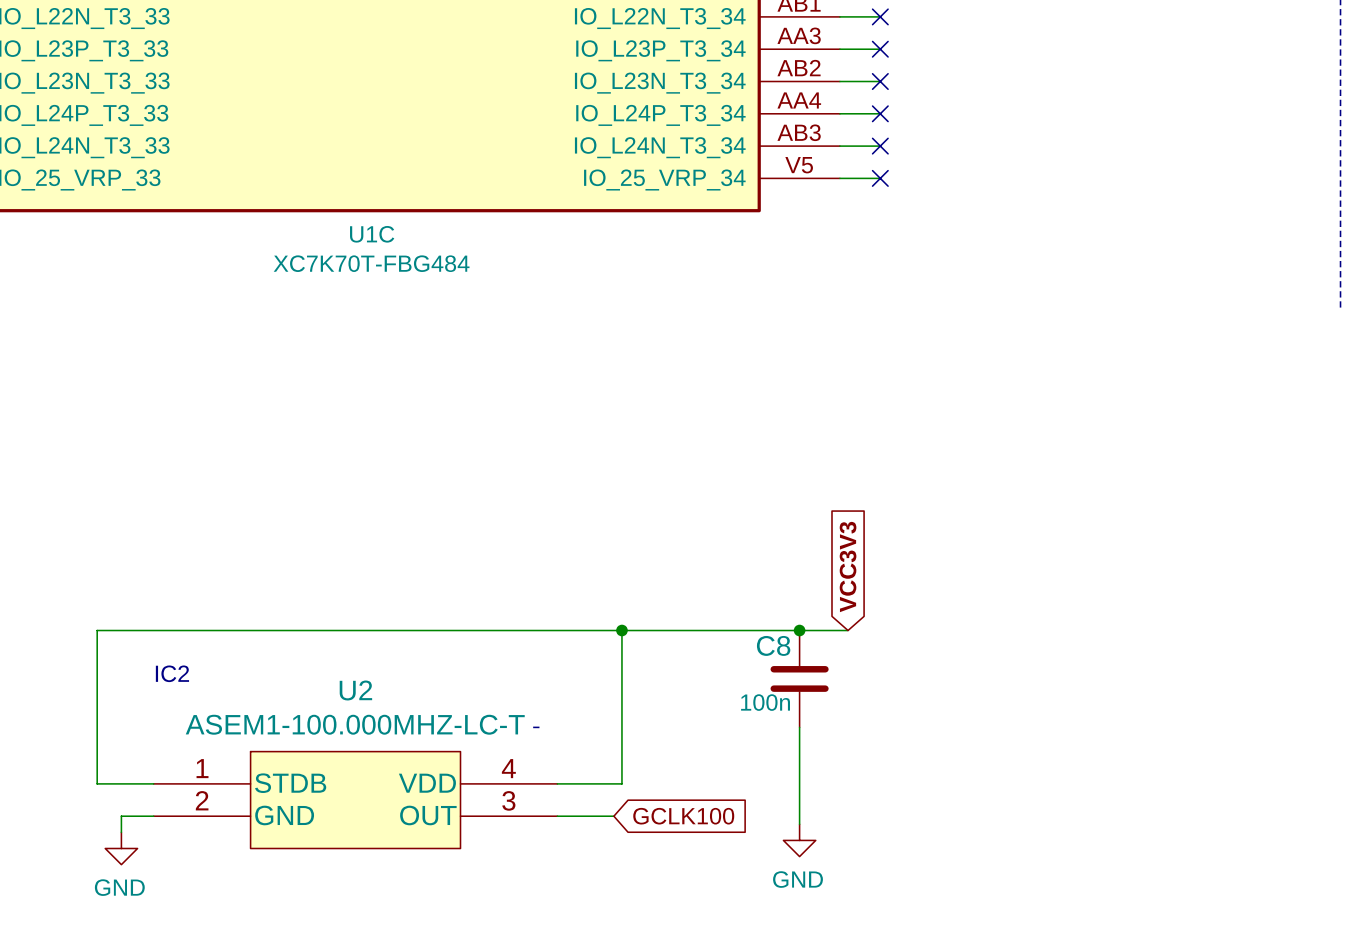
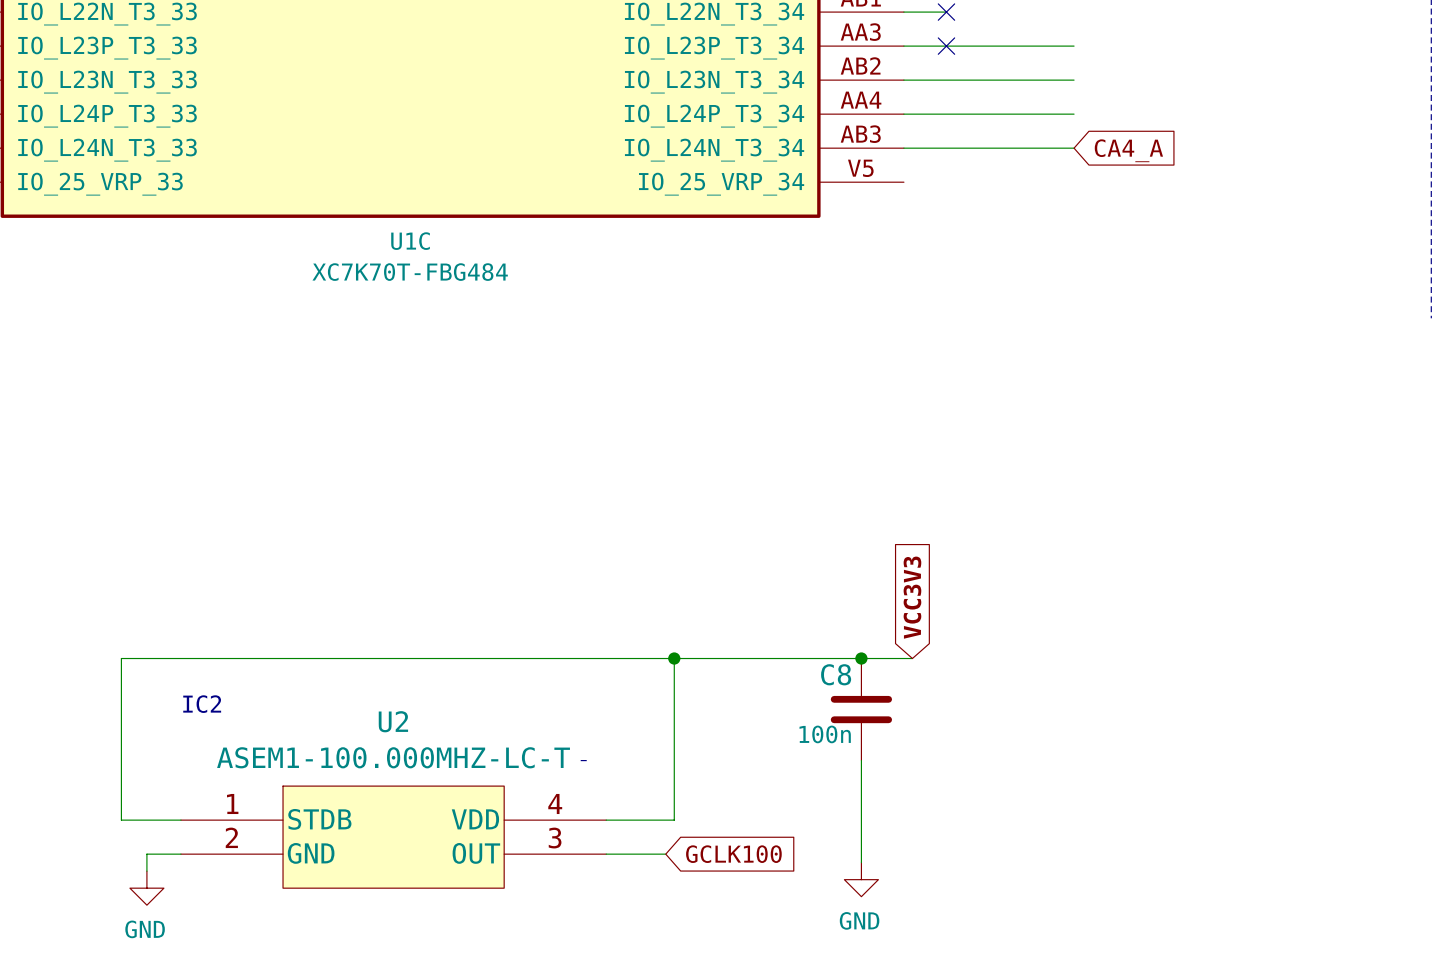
wire: none -> (946, 46) (1074, 46)
wire: none -> (946, 80) (1074, 80)
no-connect mark: (880, 81) -> none
wire: none -> (946, 114) (1074, 114)
no-connect mark: (880, 113) -> none
wire: none -> (946, 148) (1074, 148)
no-connect mark: (880, 146) -> none
global label: none -> CA4_A (1128, 150)
wire: (839, 178) (880, 178) -> none
no-connect mark: (880, 178) -> none

